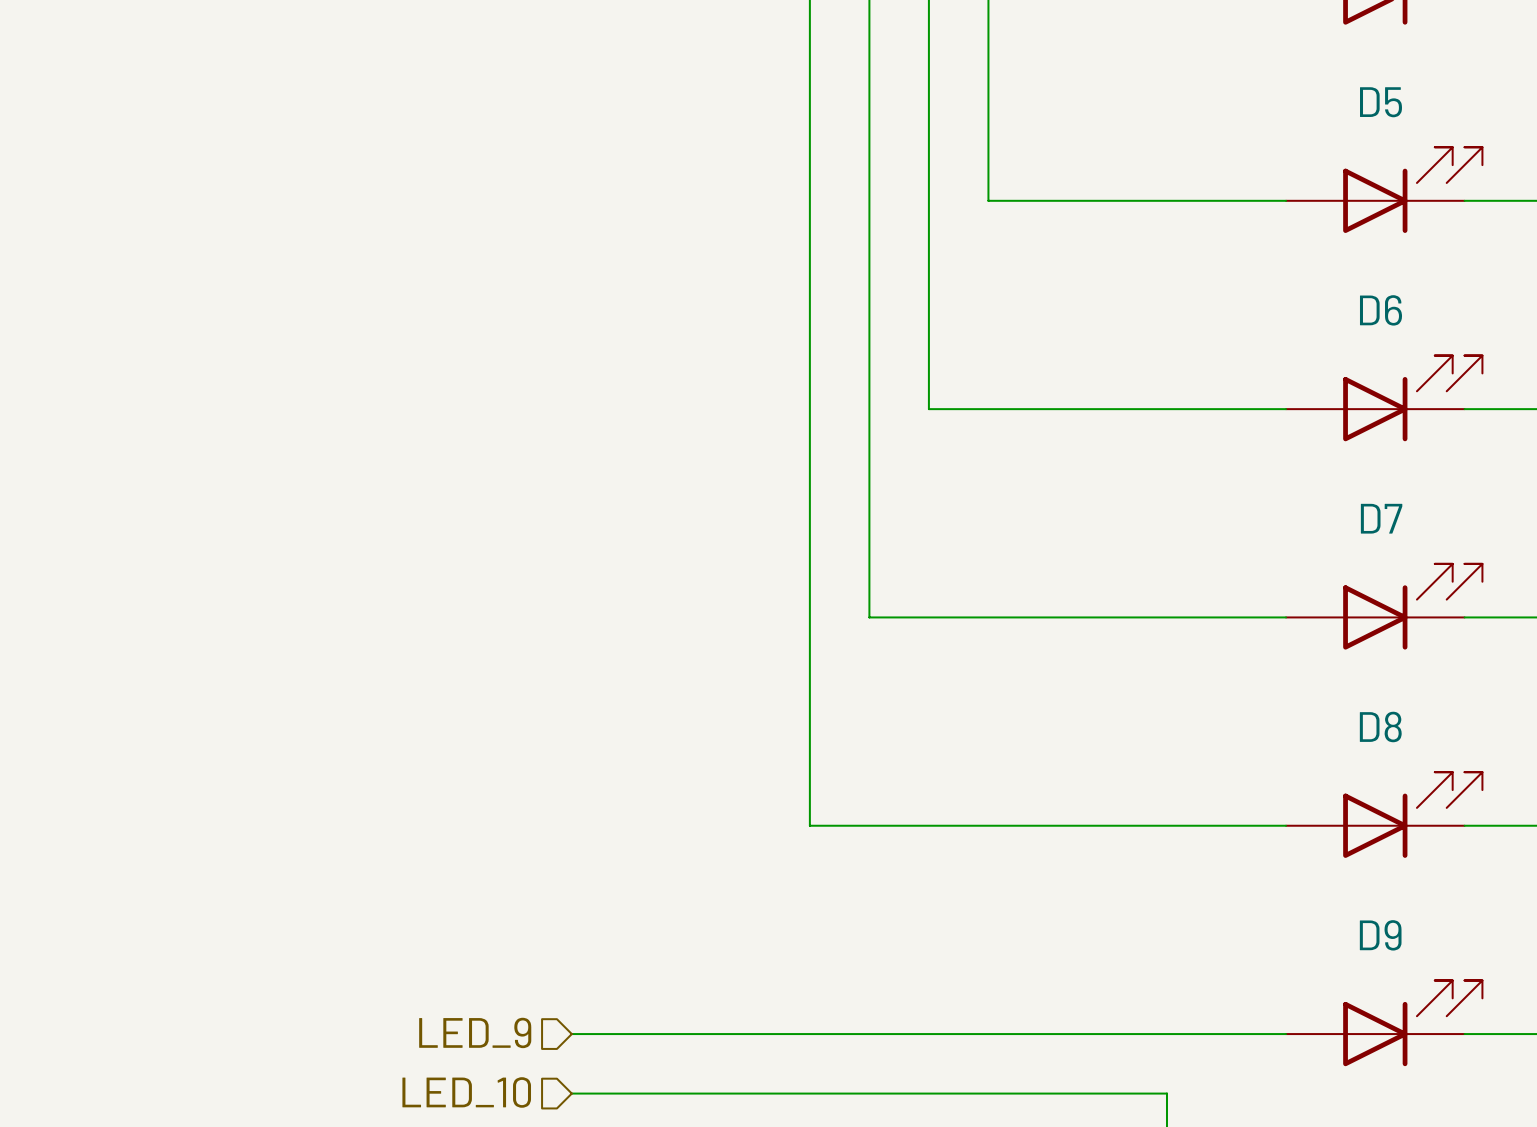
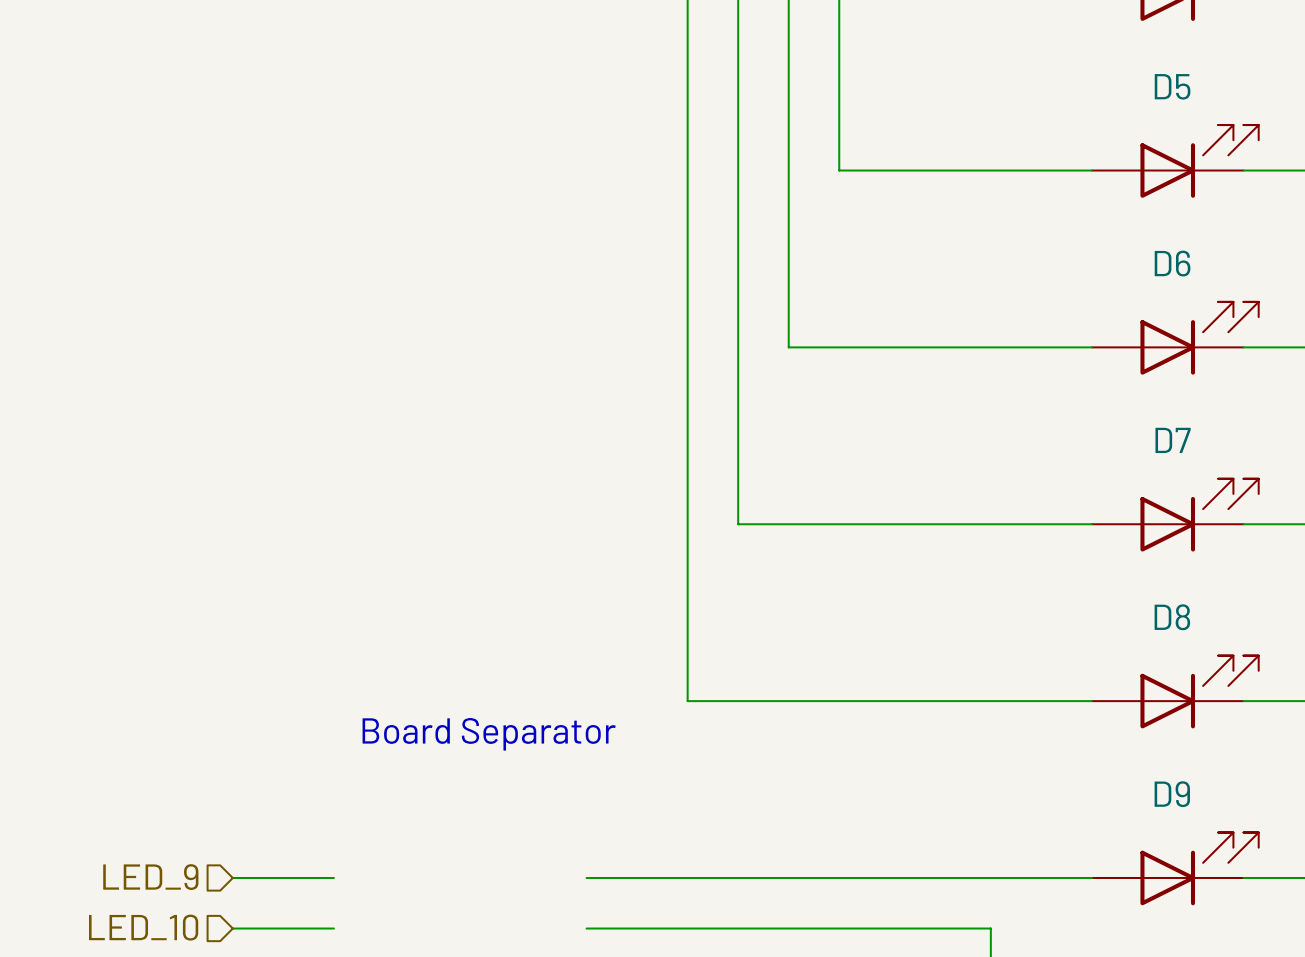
text: none -> Board Separator (489, 734)
hierarchical label position: LED_9 (475, 1032) -> LED_9 (150, 877)
wire: (571, 1034) (690, 1034) -> (232, 877) (333, 877)
hierarchical label position: LED_10 (466, 1092) -> LED_10 (143, 927)
wire: (571, 1093) (690, 1093) -> (232, 928) (333, 928)

